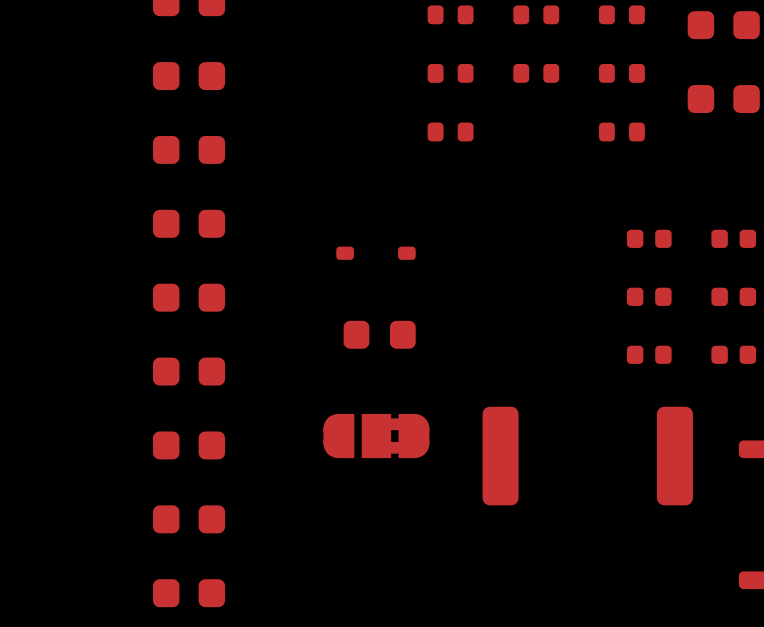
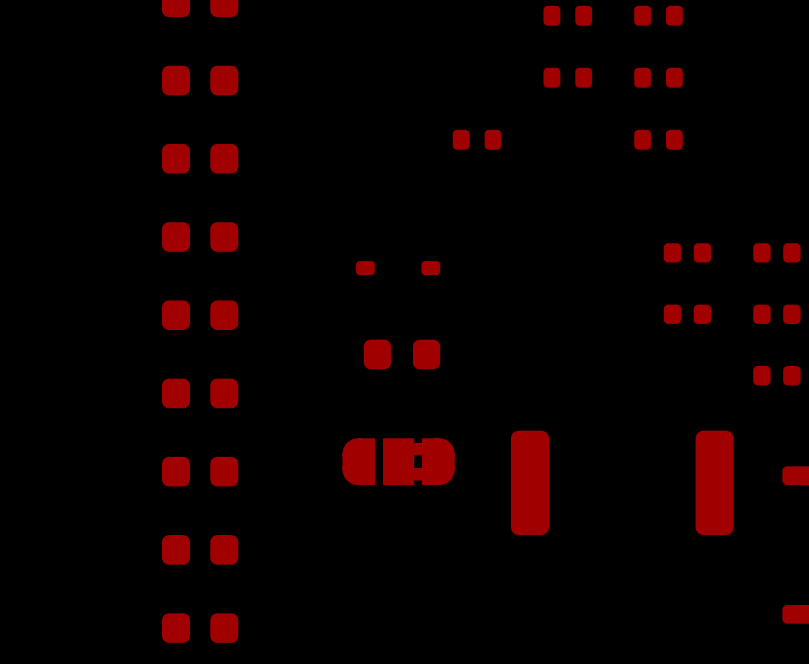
part: (450, 14) -> none
part: (723, 25) -> none
part: (450, 73) -> none
part: (723, 99) -> none
part: (649, 354) -> none

